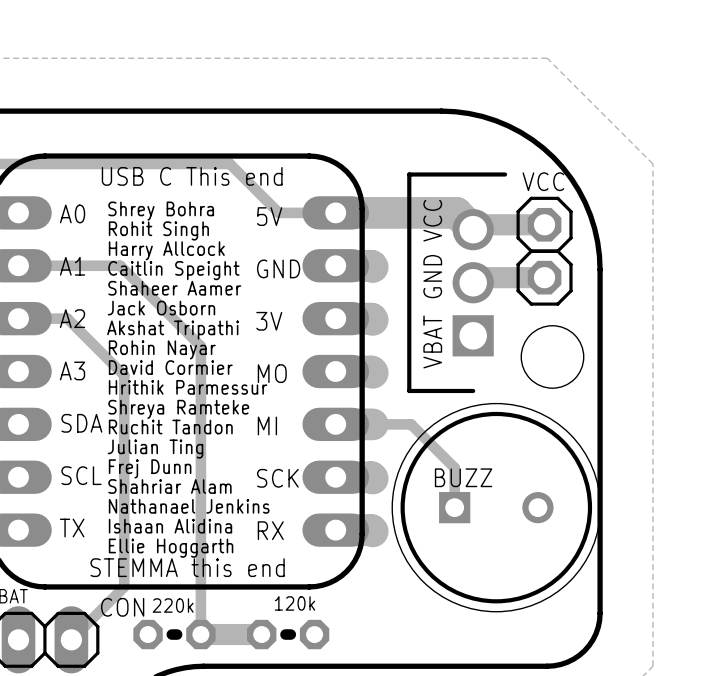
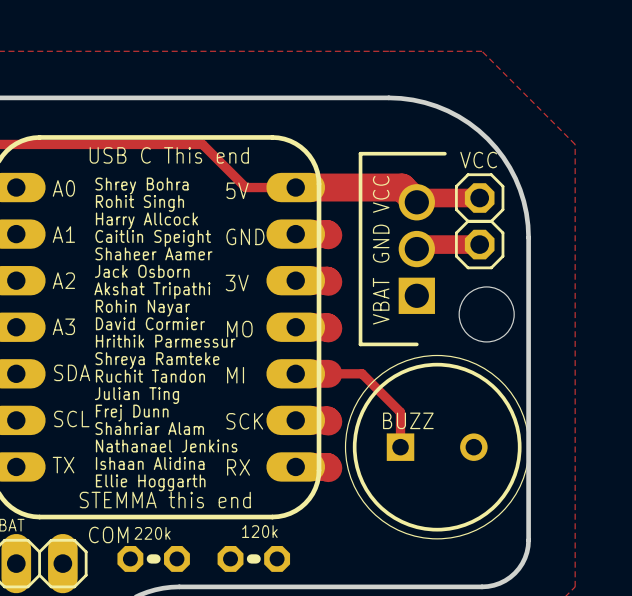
track: (18, 265) (120, 265) (200, 346) (200, 634) (261, 634) -> none
track: (18, 318) (67, 318) (124, 375) (124, 586) (71, 639) -> none
text: CON (122, 607) -> COM (108, 534)

